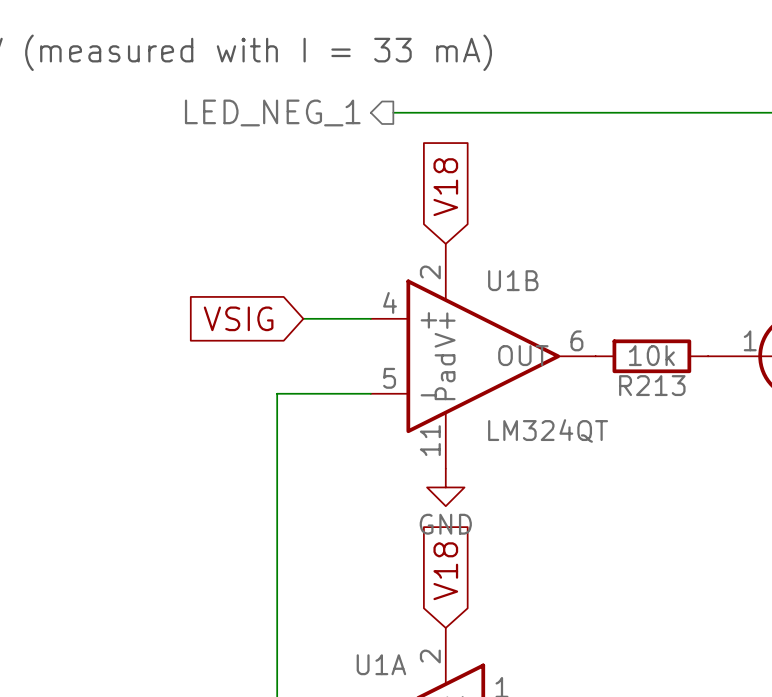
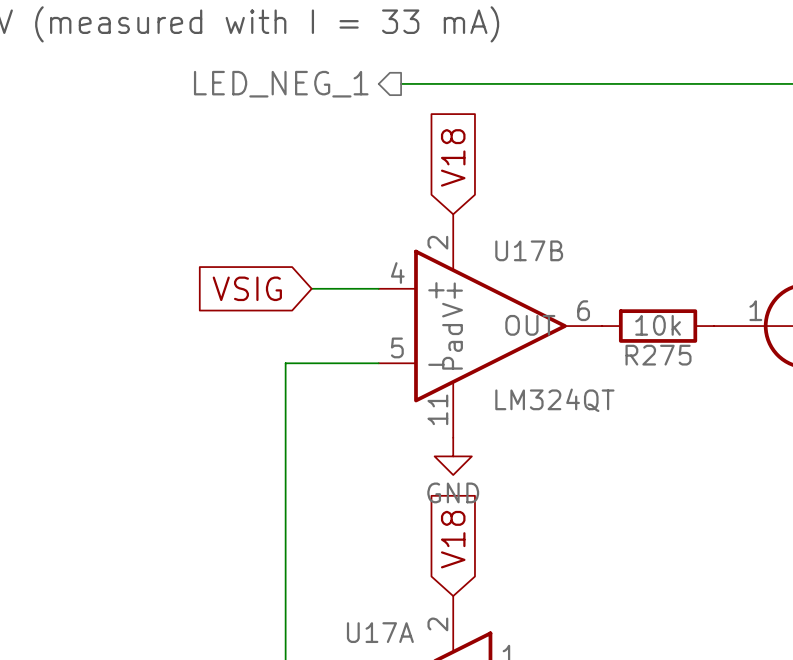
U1B name: U1B (513, 280) -> U17B (529, 250)
R213 name: R213 (652, 385) -> R275 (658, 355)
U1A name: U1A (381, 664) -> U17A (380, 632)

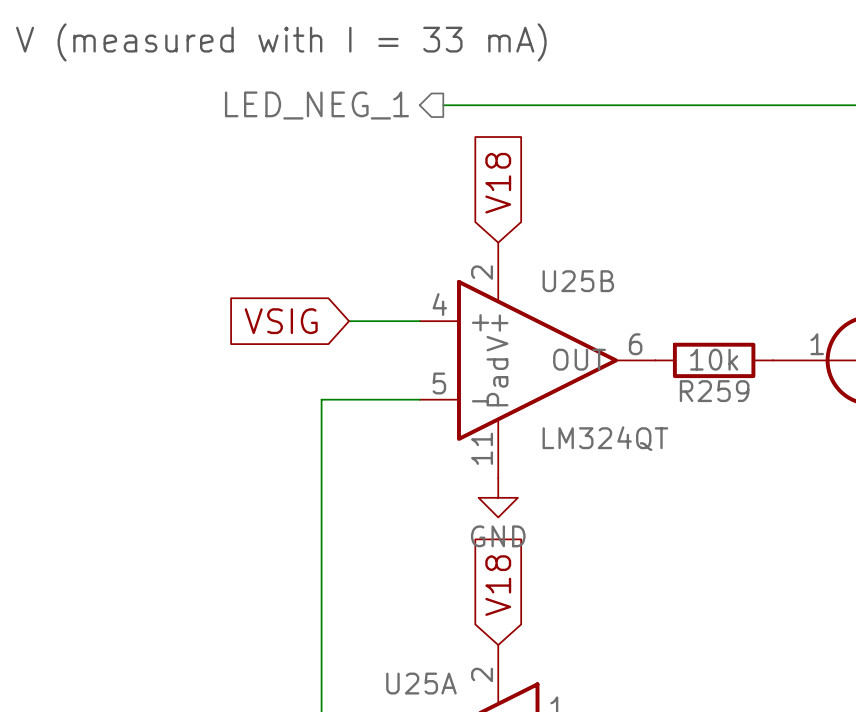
U17B name: U17B (529, 250) -> U25B (578, 281)
R275 name: R275 (658, 355) -> R259 (714, 391)
U17A name: U17A (380, 632) -> U25A (421, 683)

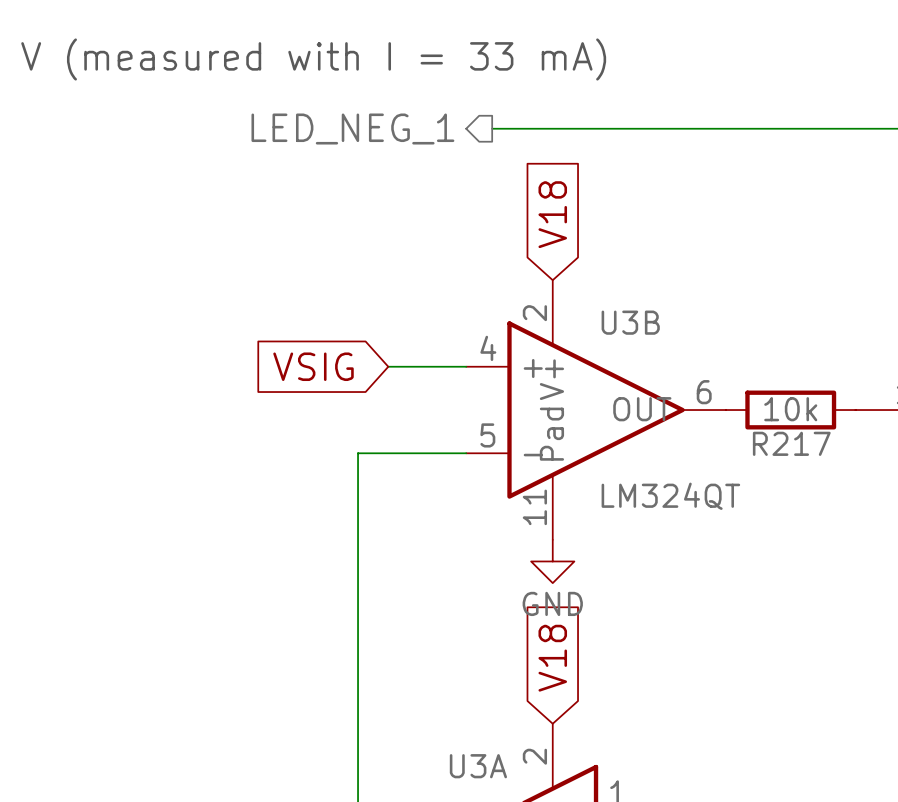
U25B name: U25B (578, 281) -> U3B (630, 322)
R259 name: R259 (714, 391) -> R217 (791, 443)
U25A name: U25A (421, 683) -> U3A (478, 766)

